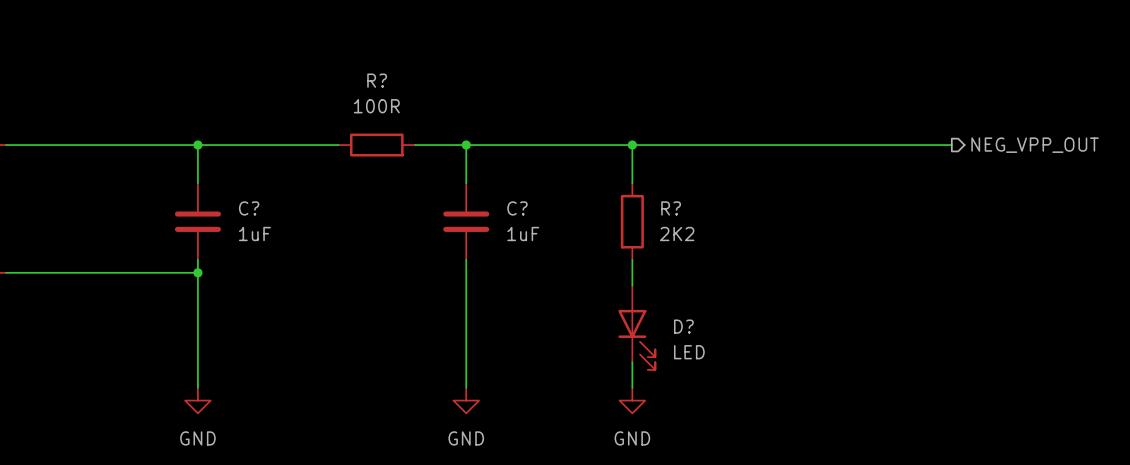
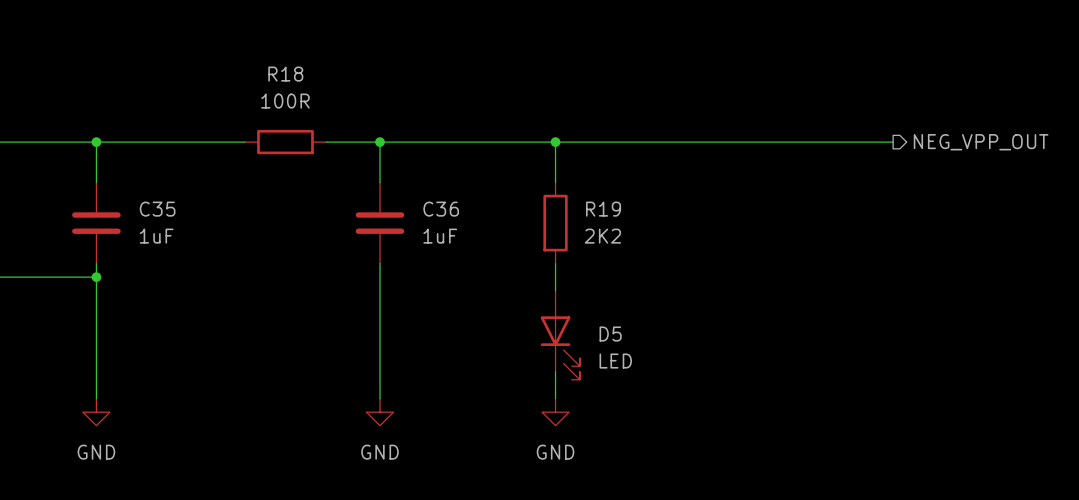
R? name: R? (377, 80) -> R18 (285, 74)
C? name: C? (249, 208) -> C35 (157, 209)
C? name: C? (517, 208) -> C36 (441, 209)
R? name: R? (671, 208) -> R19 (603, 209)
D? name: D? (683, 326) -> D5 (610, 334)

